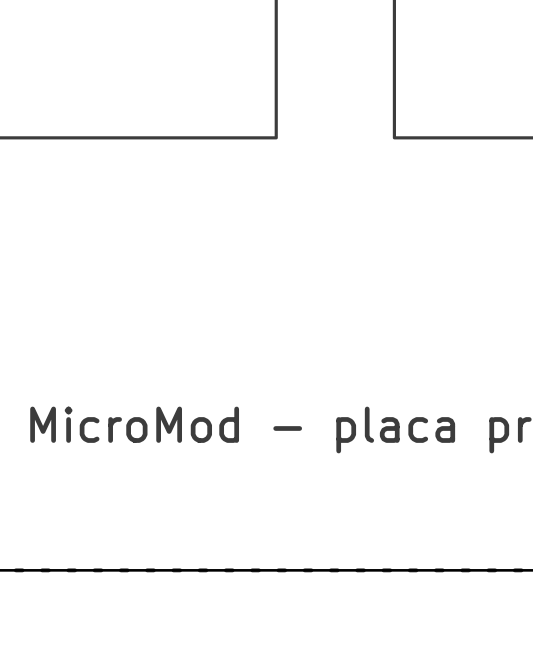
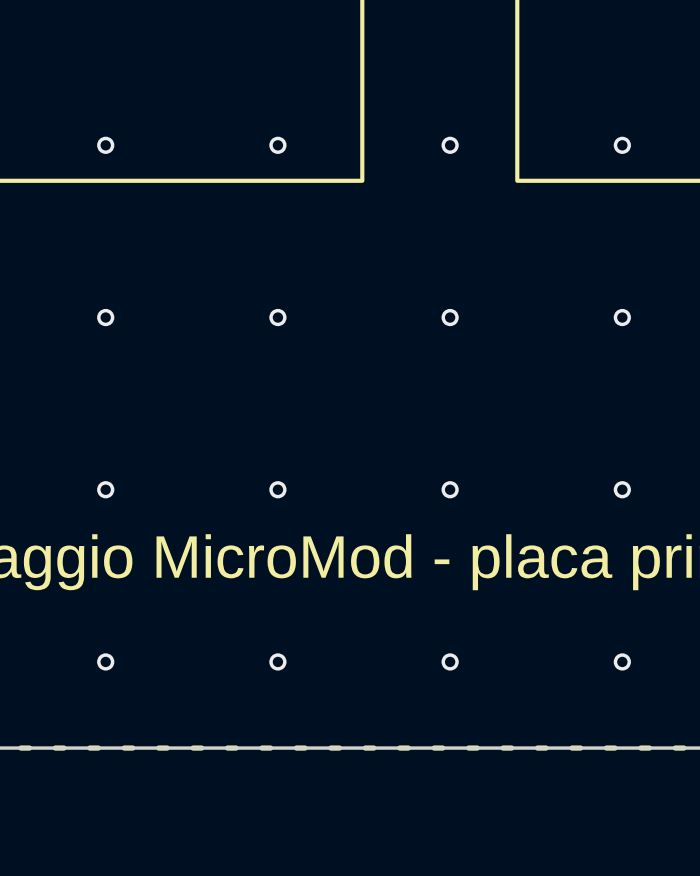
via: none -> (105, 145)
via: none -> (277, 145)
via: none -> (450, 145)
via: none -> (622, 145)
via: none -> (105, 317)
via: none -> (277, 317)
via: none -> (450, 317)
via: none -> (622, 317)
via: none -> (105, 489)
via: none -> (277, 489)
via: none -> (450, 489)
via: none -> (622, 489)
via: none -> (105, 661)
via: none -> (277, 661)
via: none -> (450, 661)
via: none -> (622, 661)

